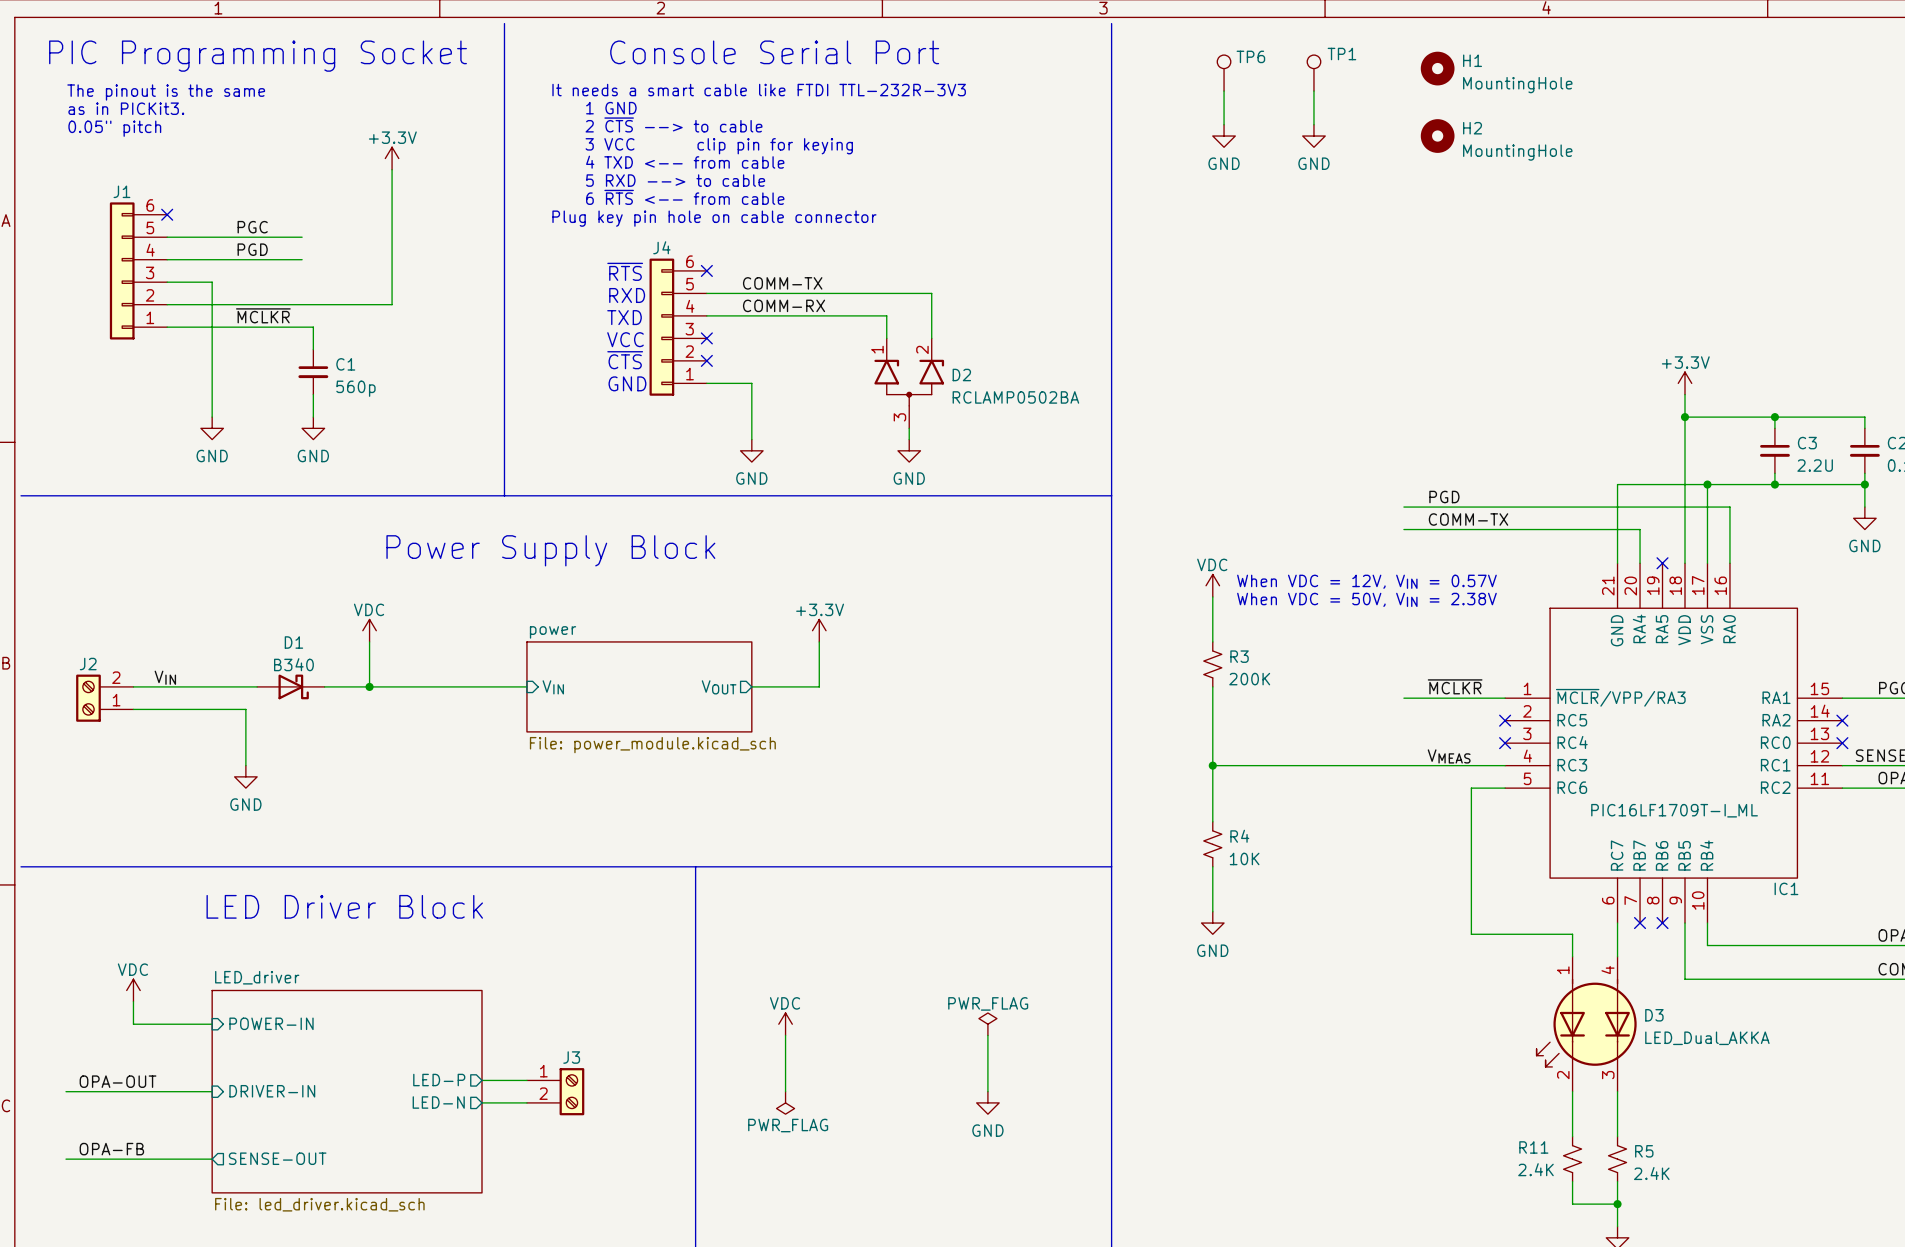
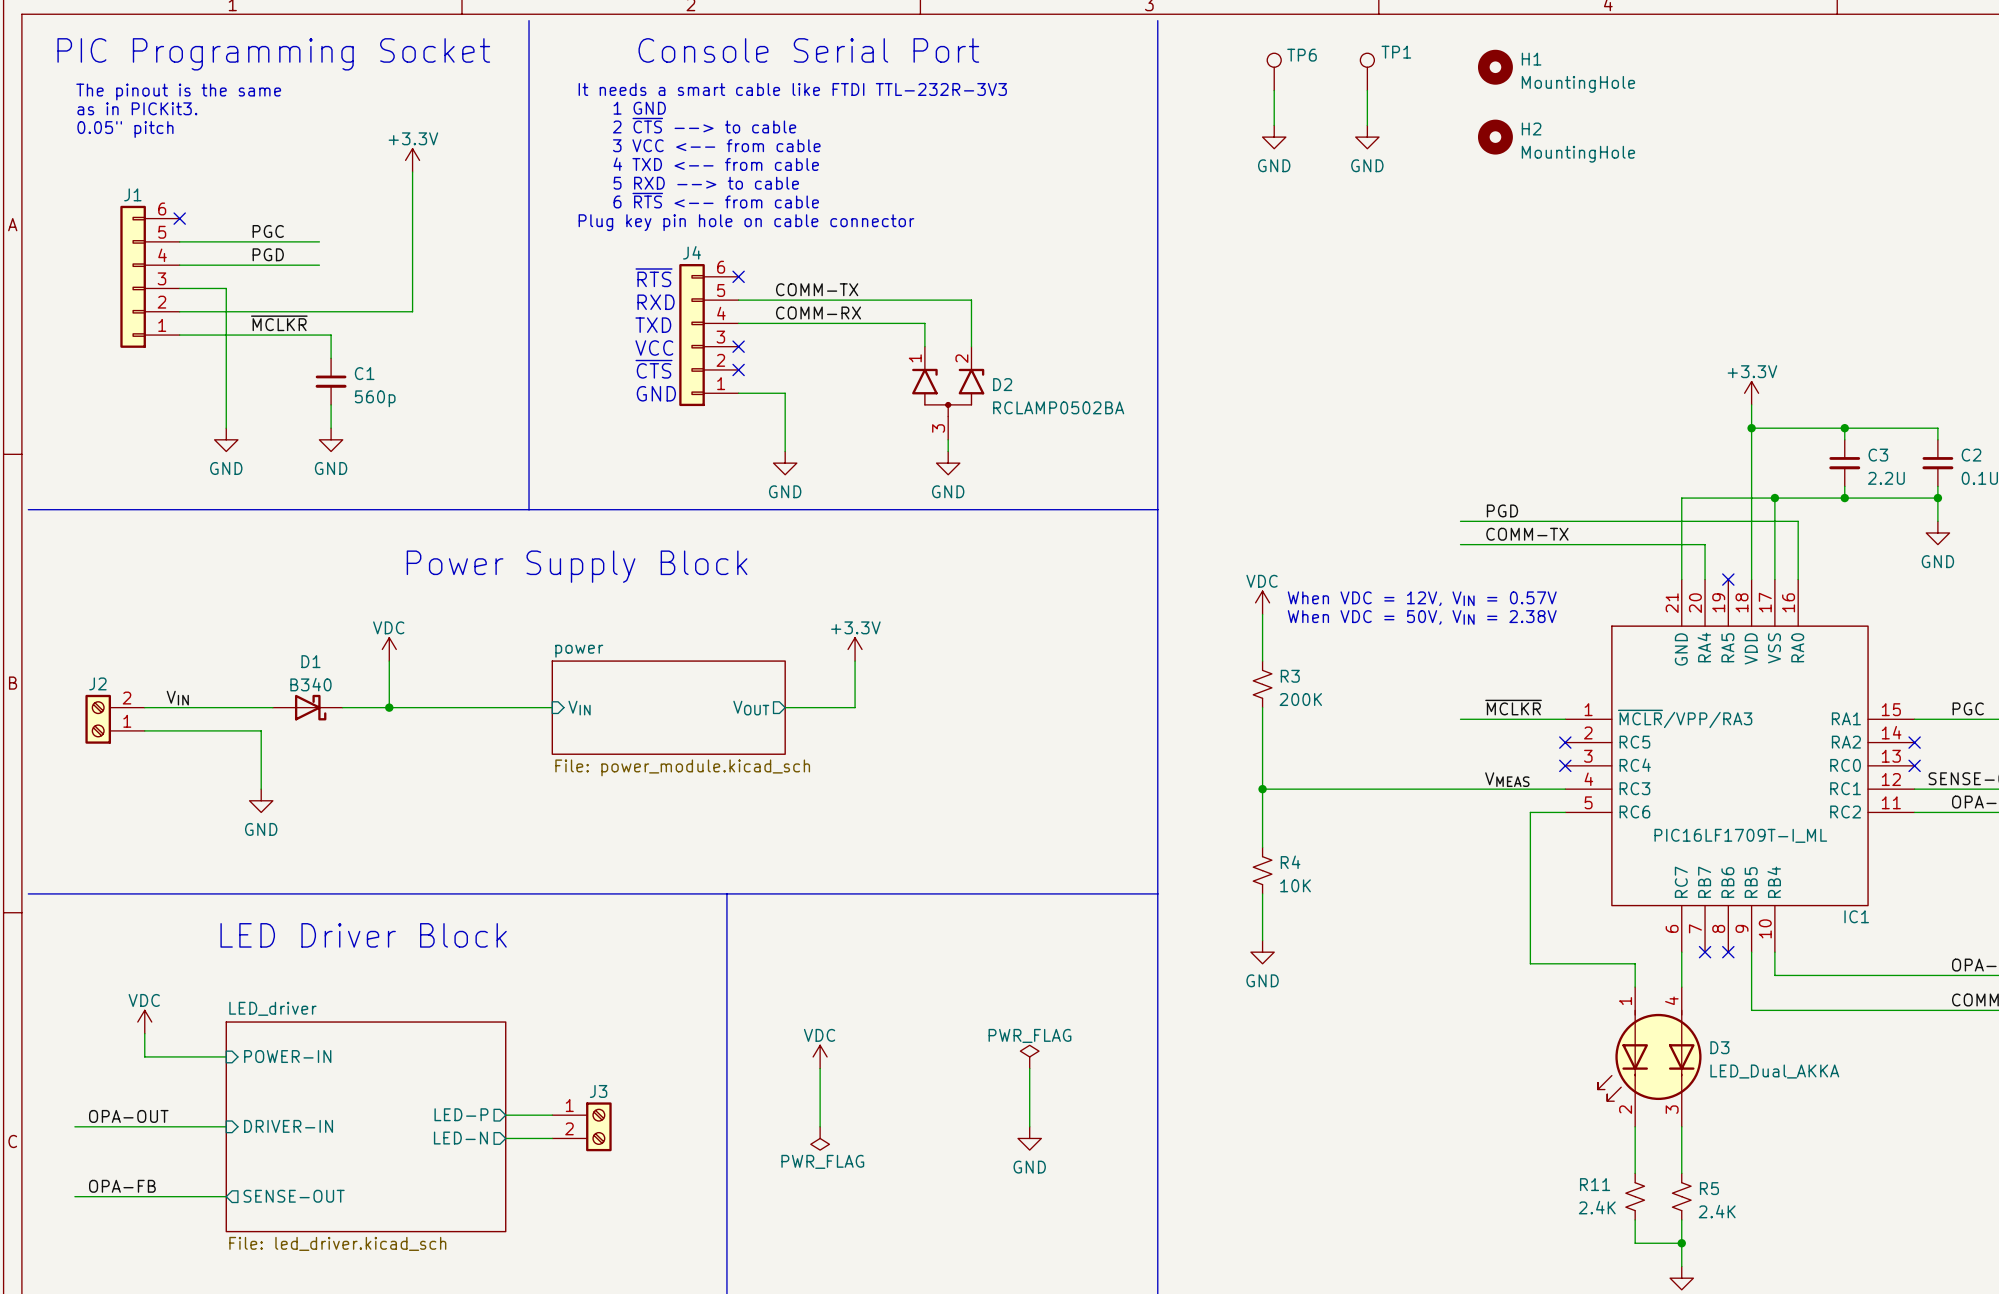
text: 3 VCC clip pin for keying (719, 146) -> 3 VCC <-- from cable (716, 145)

